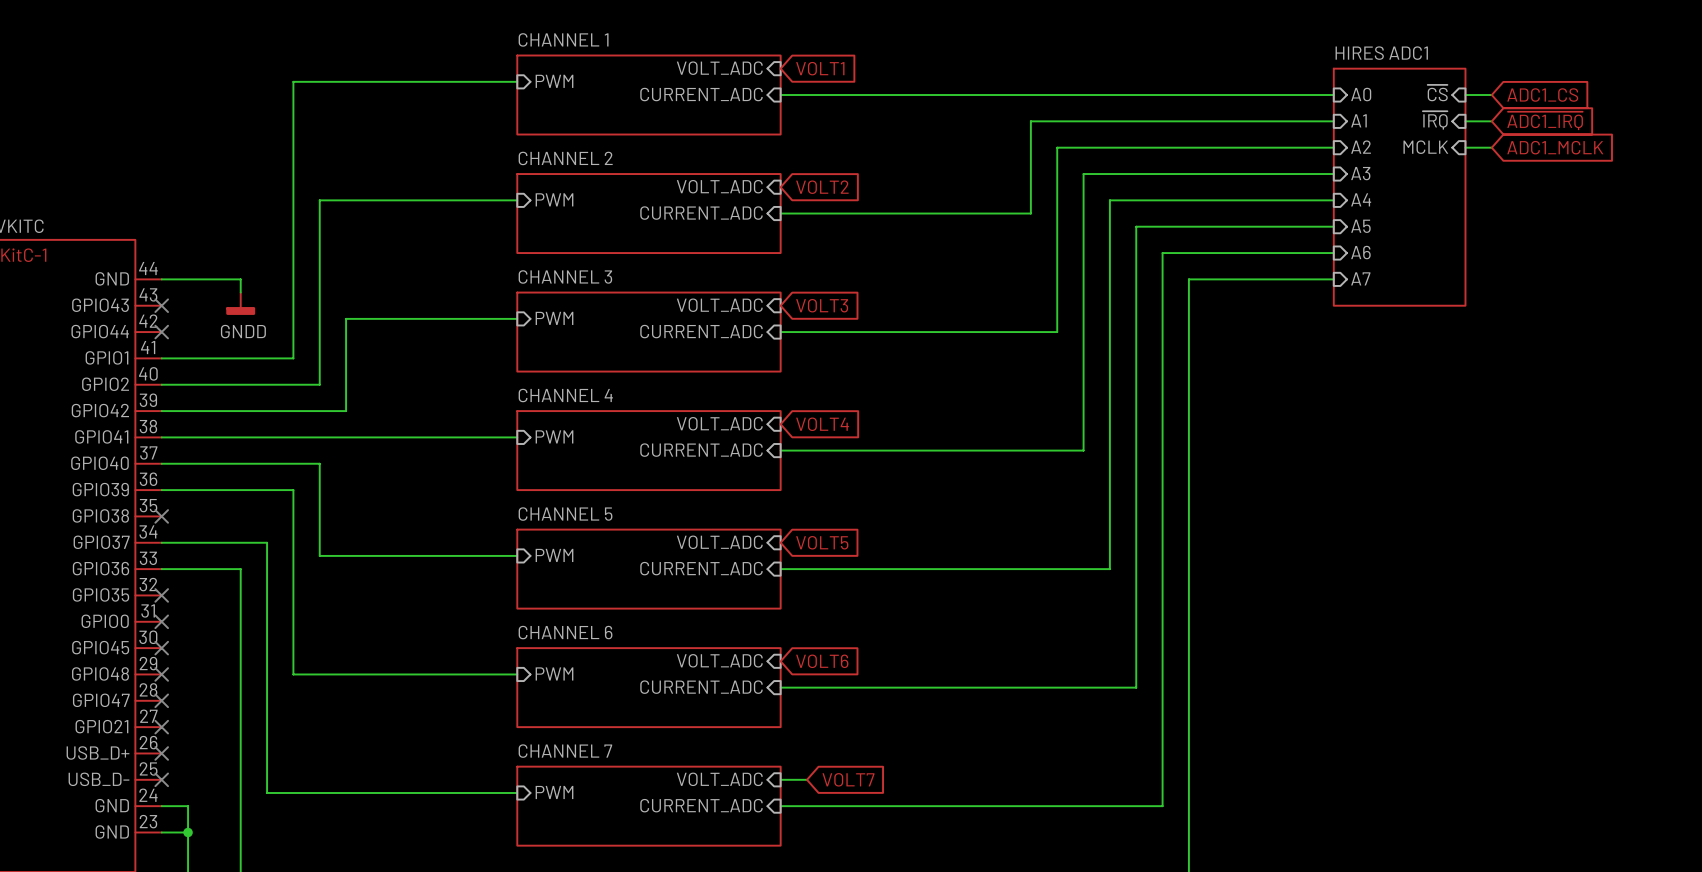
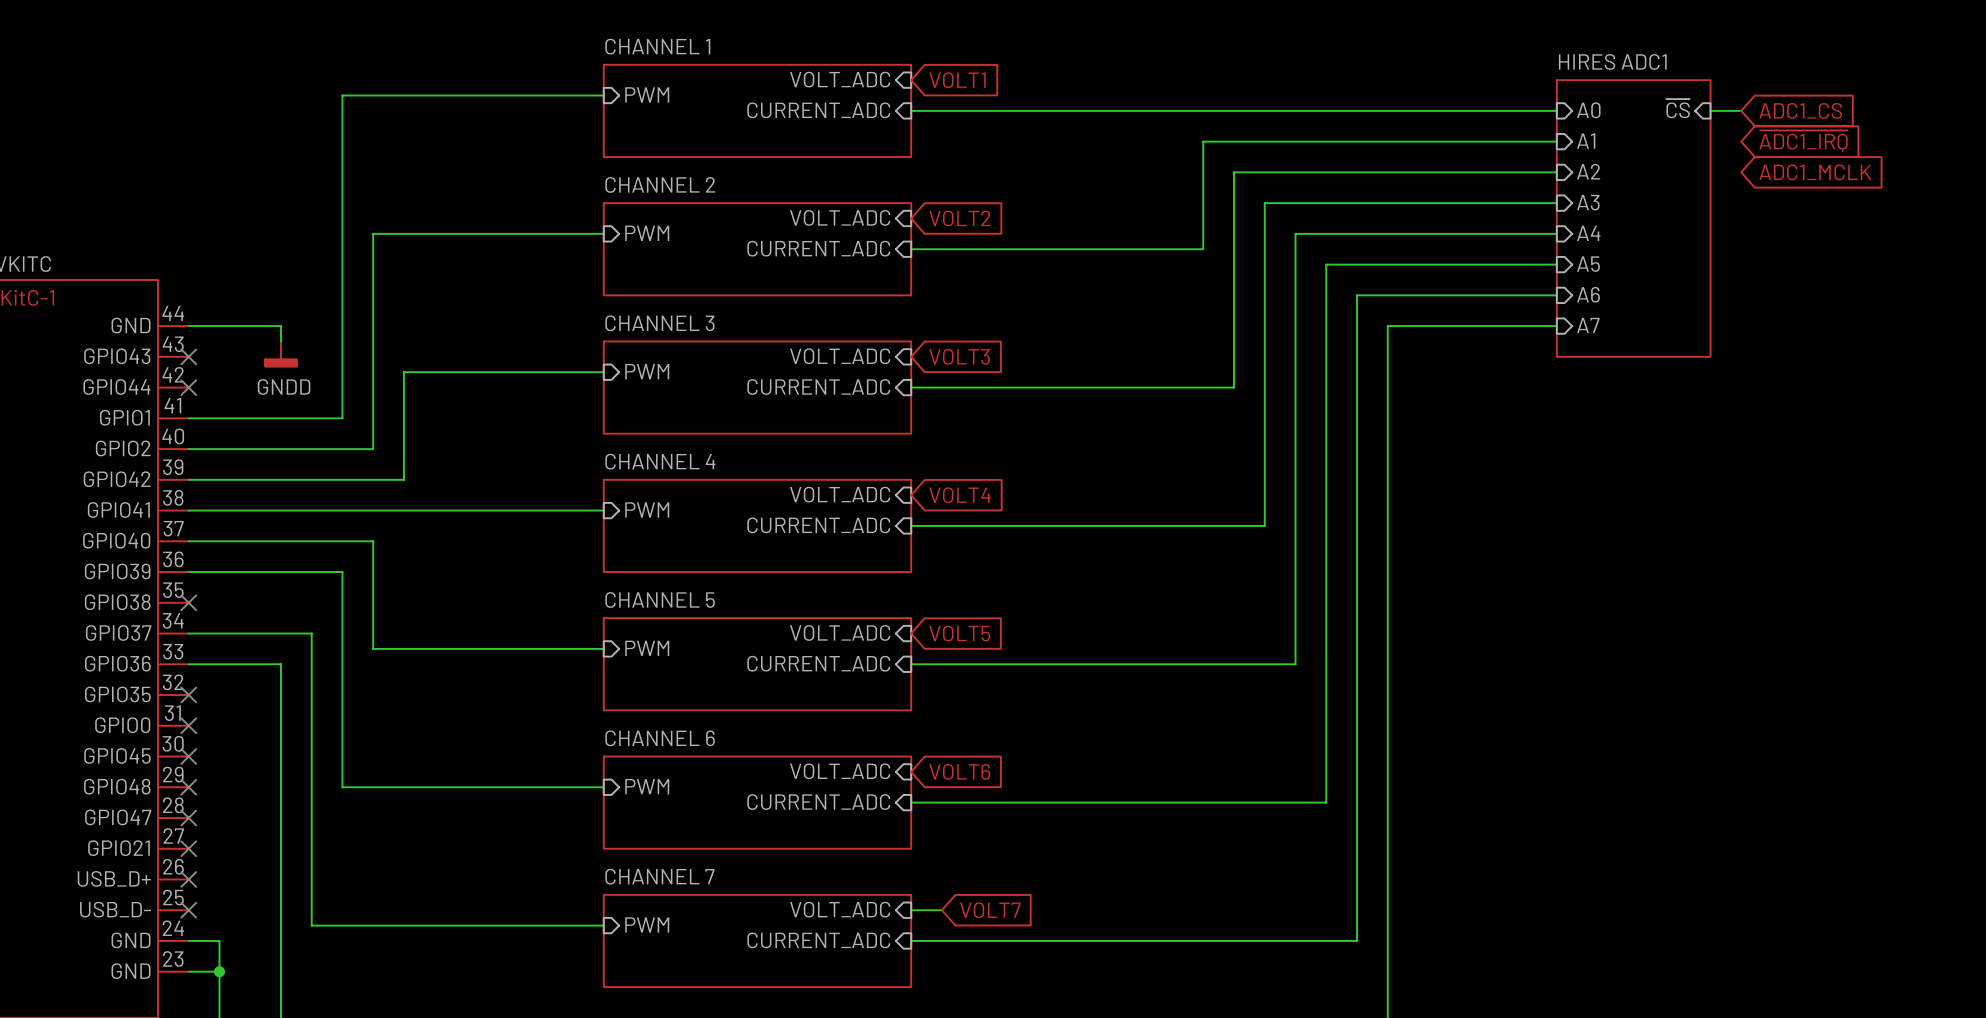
sheet pin: ~{IRQ} (1435, 120) -> none
wire: (1465, 121) (1491, 121) -> none
sheet pin: MCLK (1425, 147) -> none
wire: (1465, 147) (1491, 147) -> none

